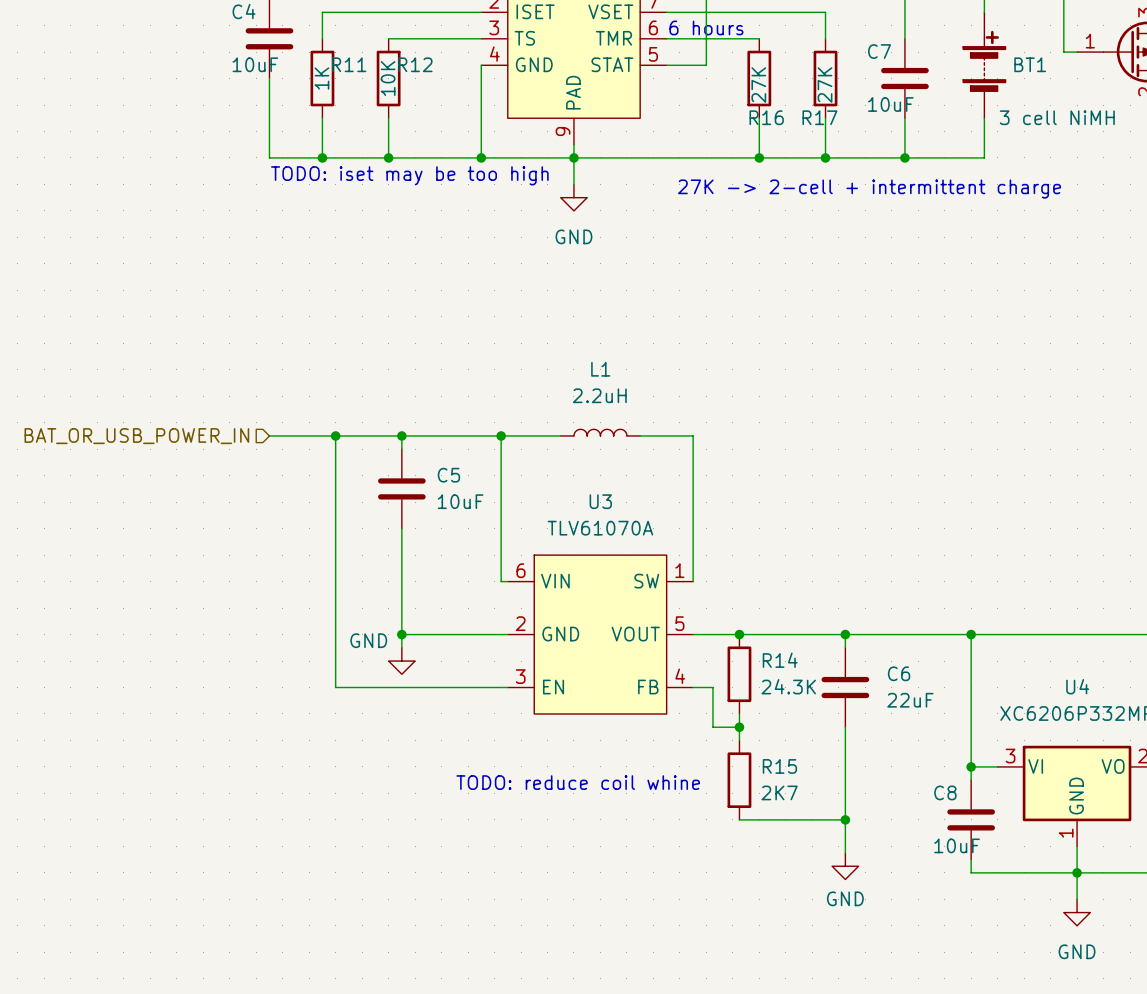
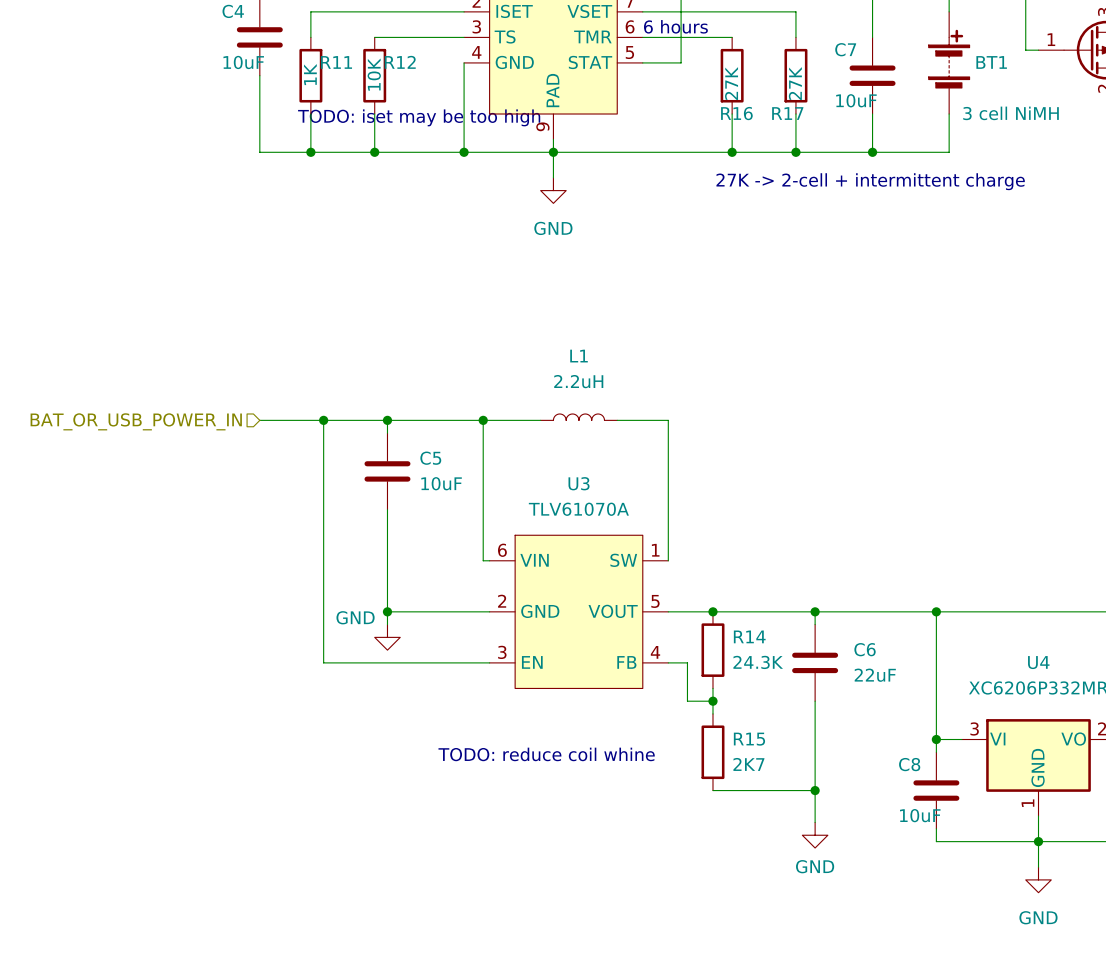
text position: TODO: iset may be too high (409, 175) -> TODO: iset may be too high (419, 117)

